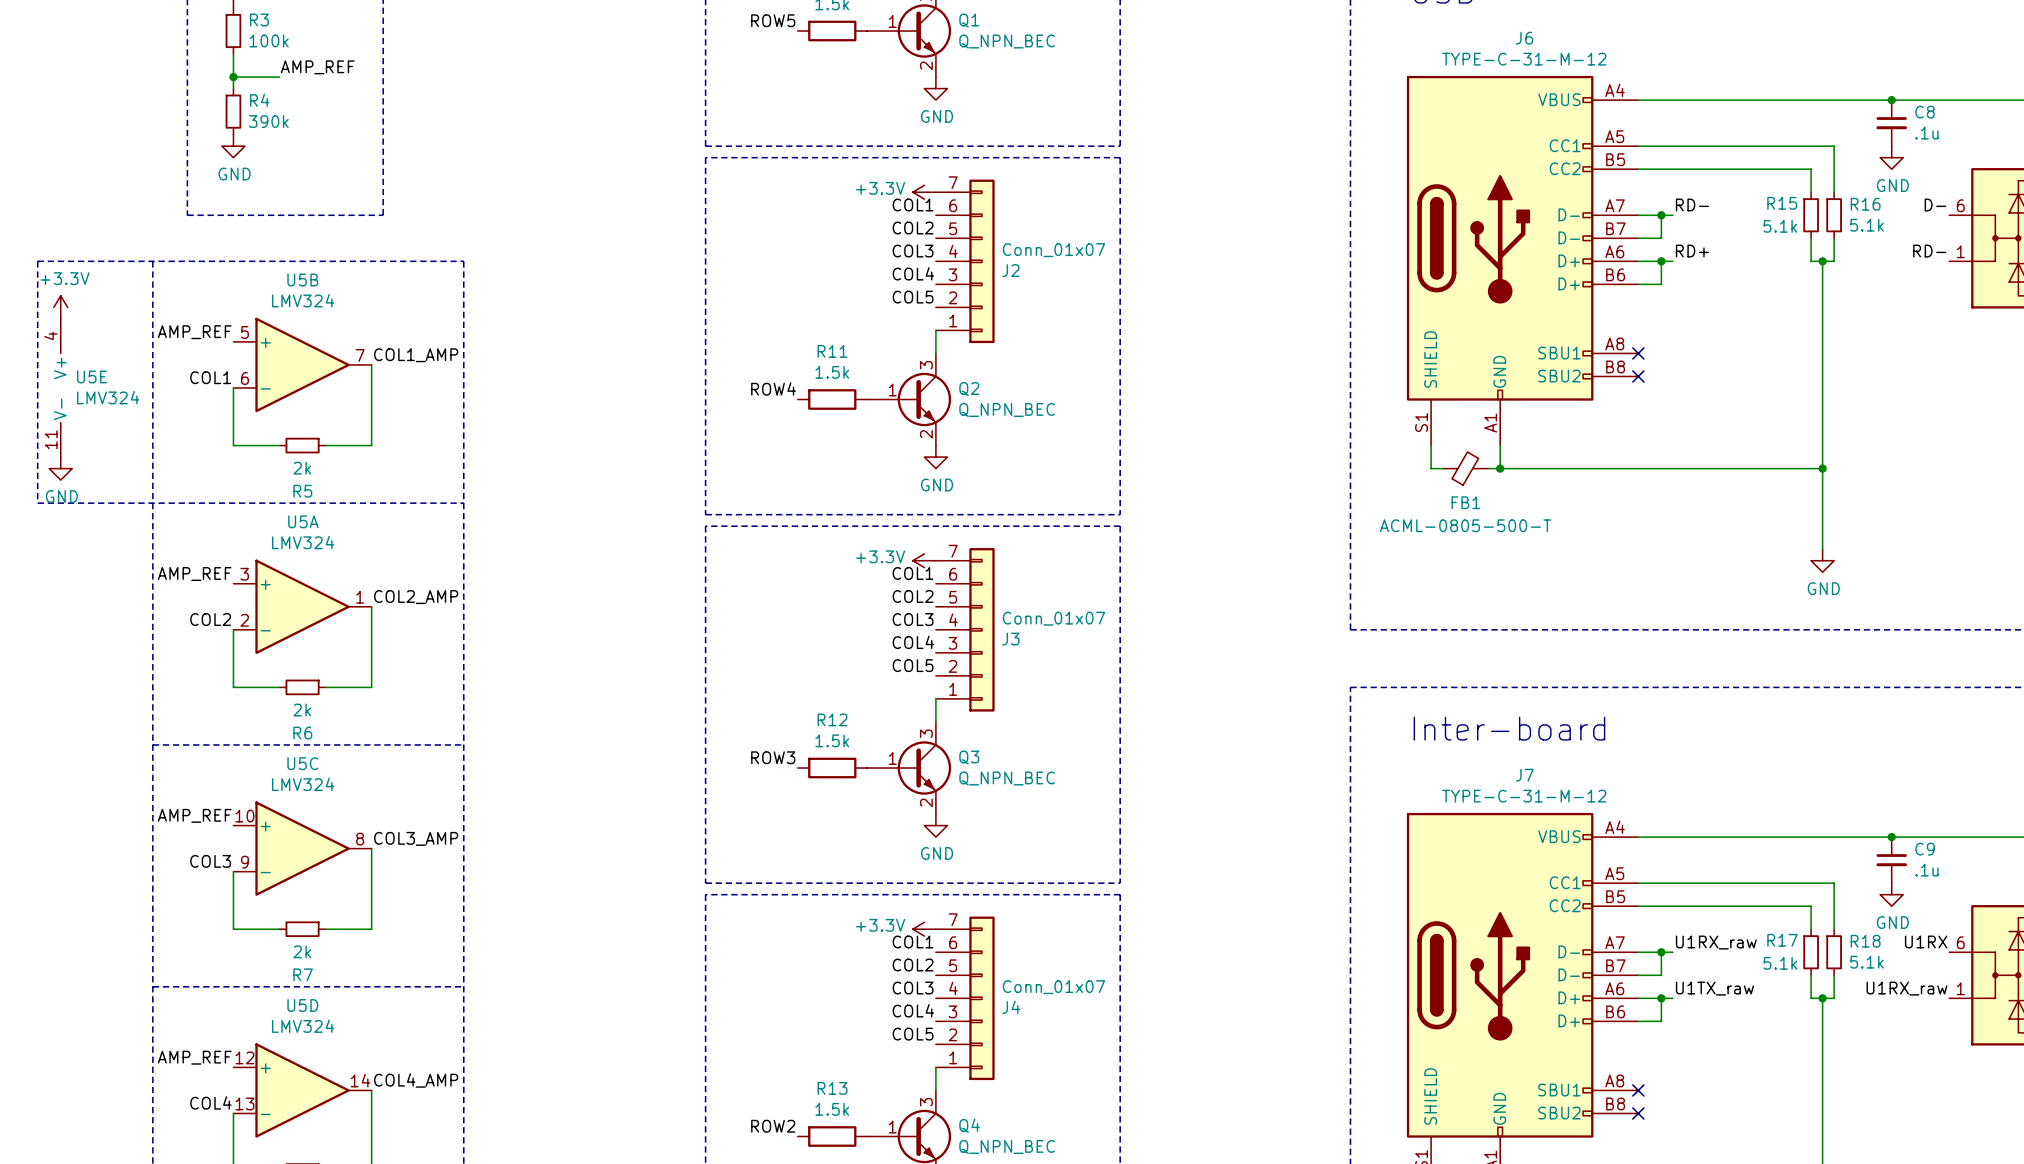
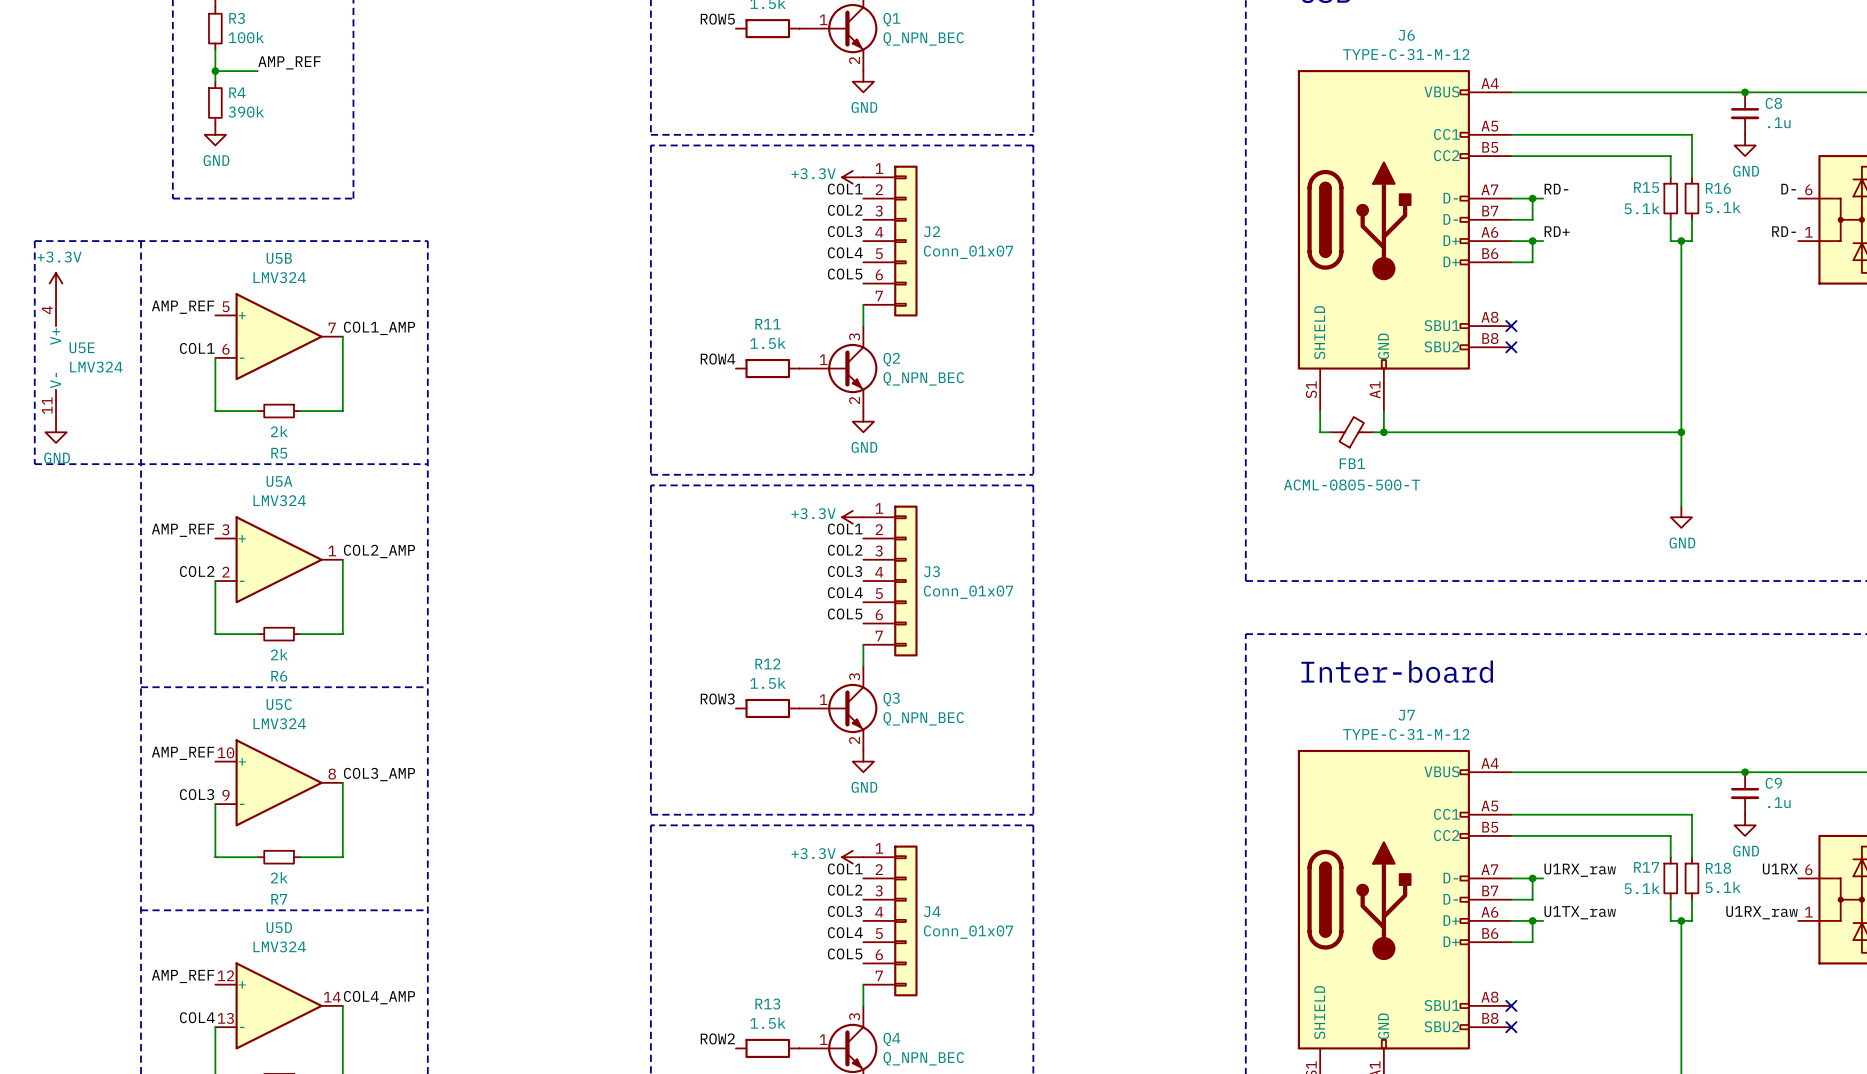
J2 flip: as is (981, 261) -> up-down (905, 241)
J3 flip: as is (981, 629) -> up-down (905, 581)
J4 flip: as is (981, 998) -> up-down (905, 920)

